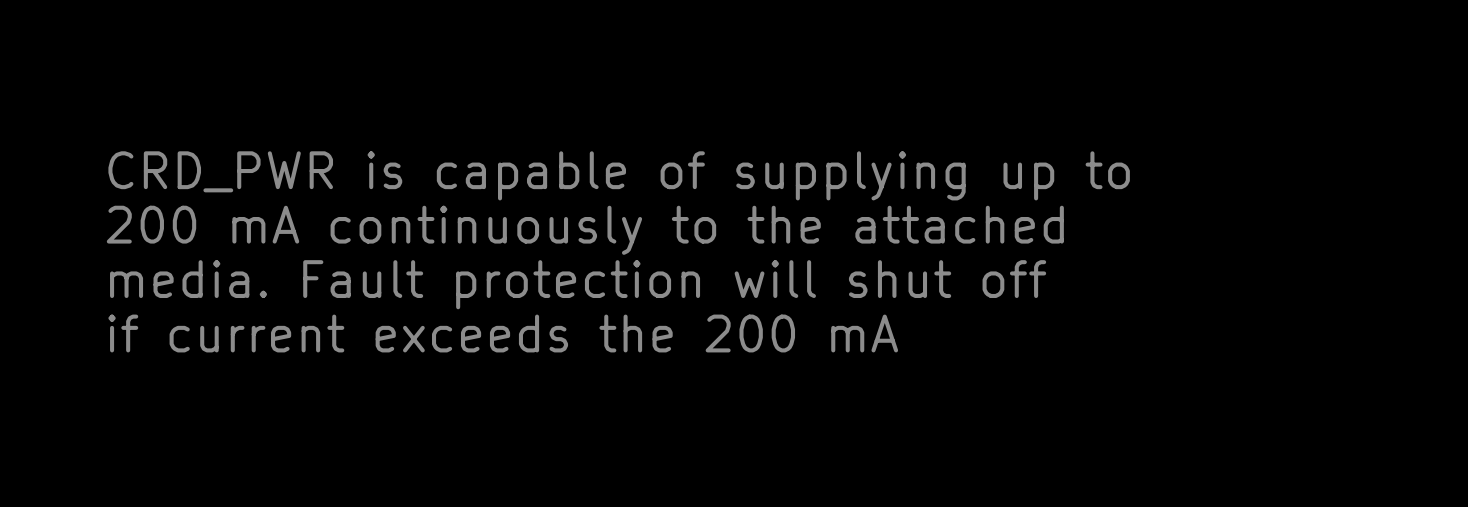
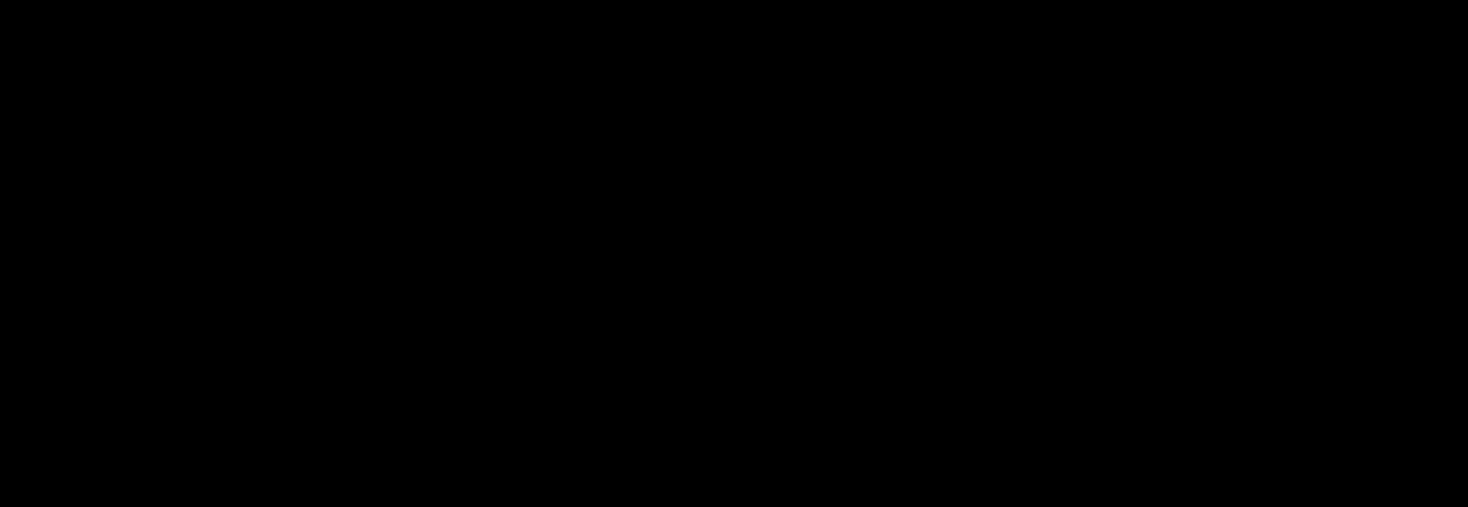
text: CRD_PWR is capable of supplying up to (619, 175) -> none
text: 200 mA continuously to the attached (585, 230) -> none
text: media. Fault protection will shut off (578, 284) -> none
text: if current exceeds the 200 mA (503, 333) -> none

